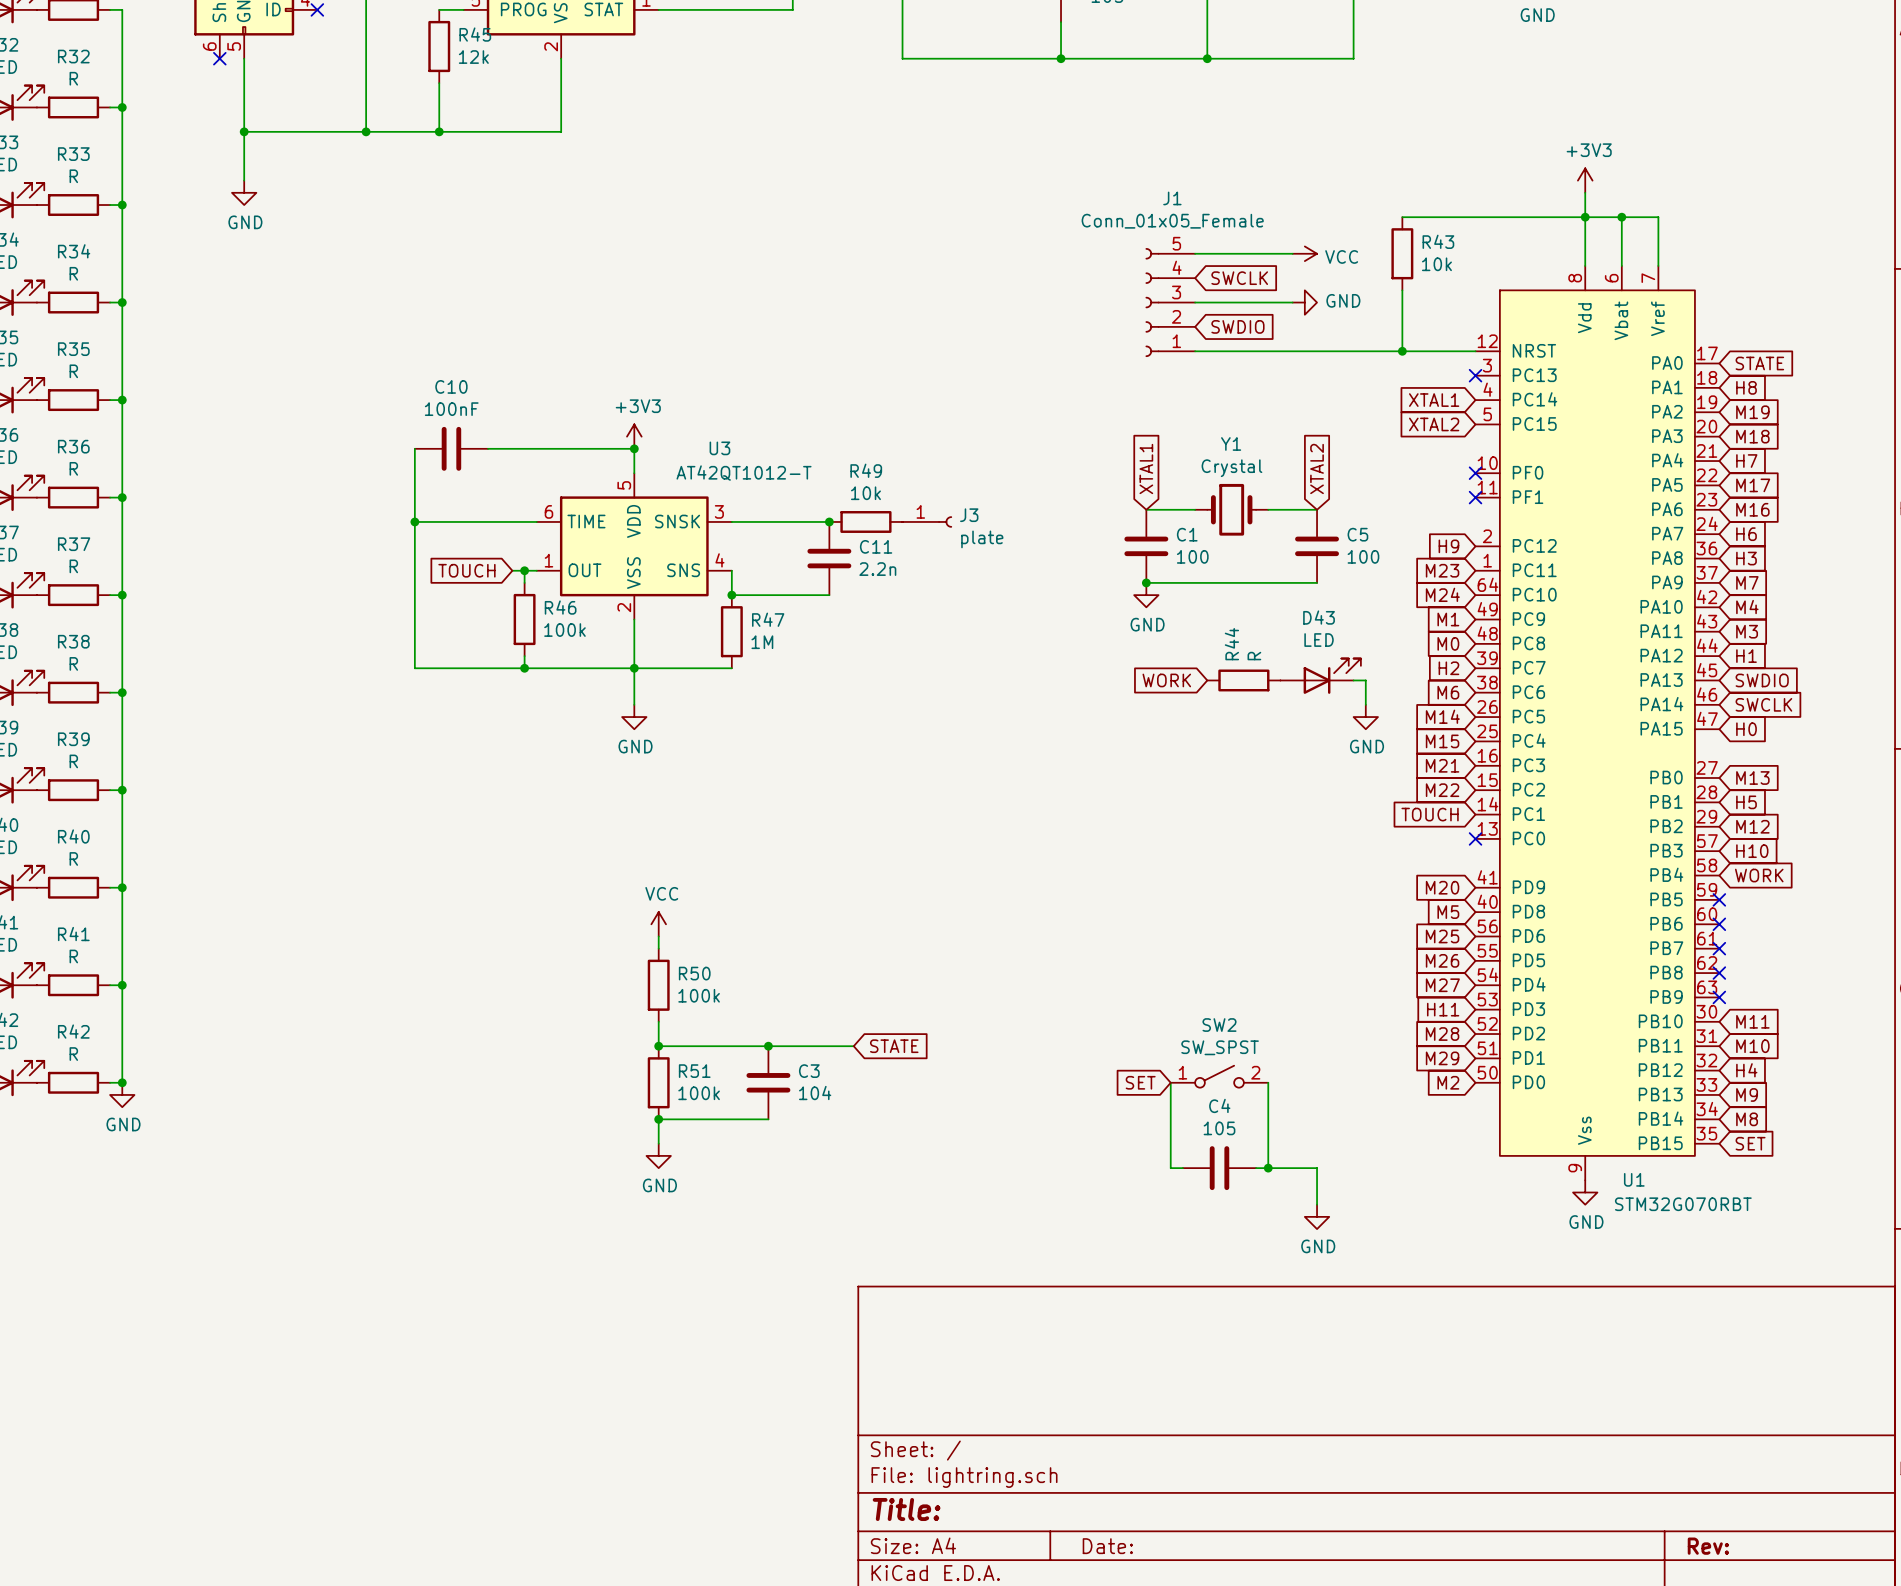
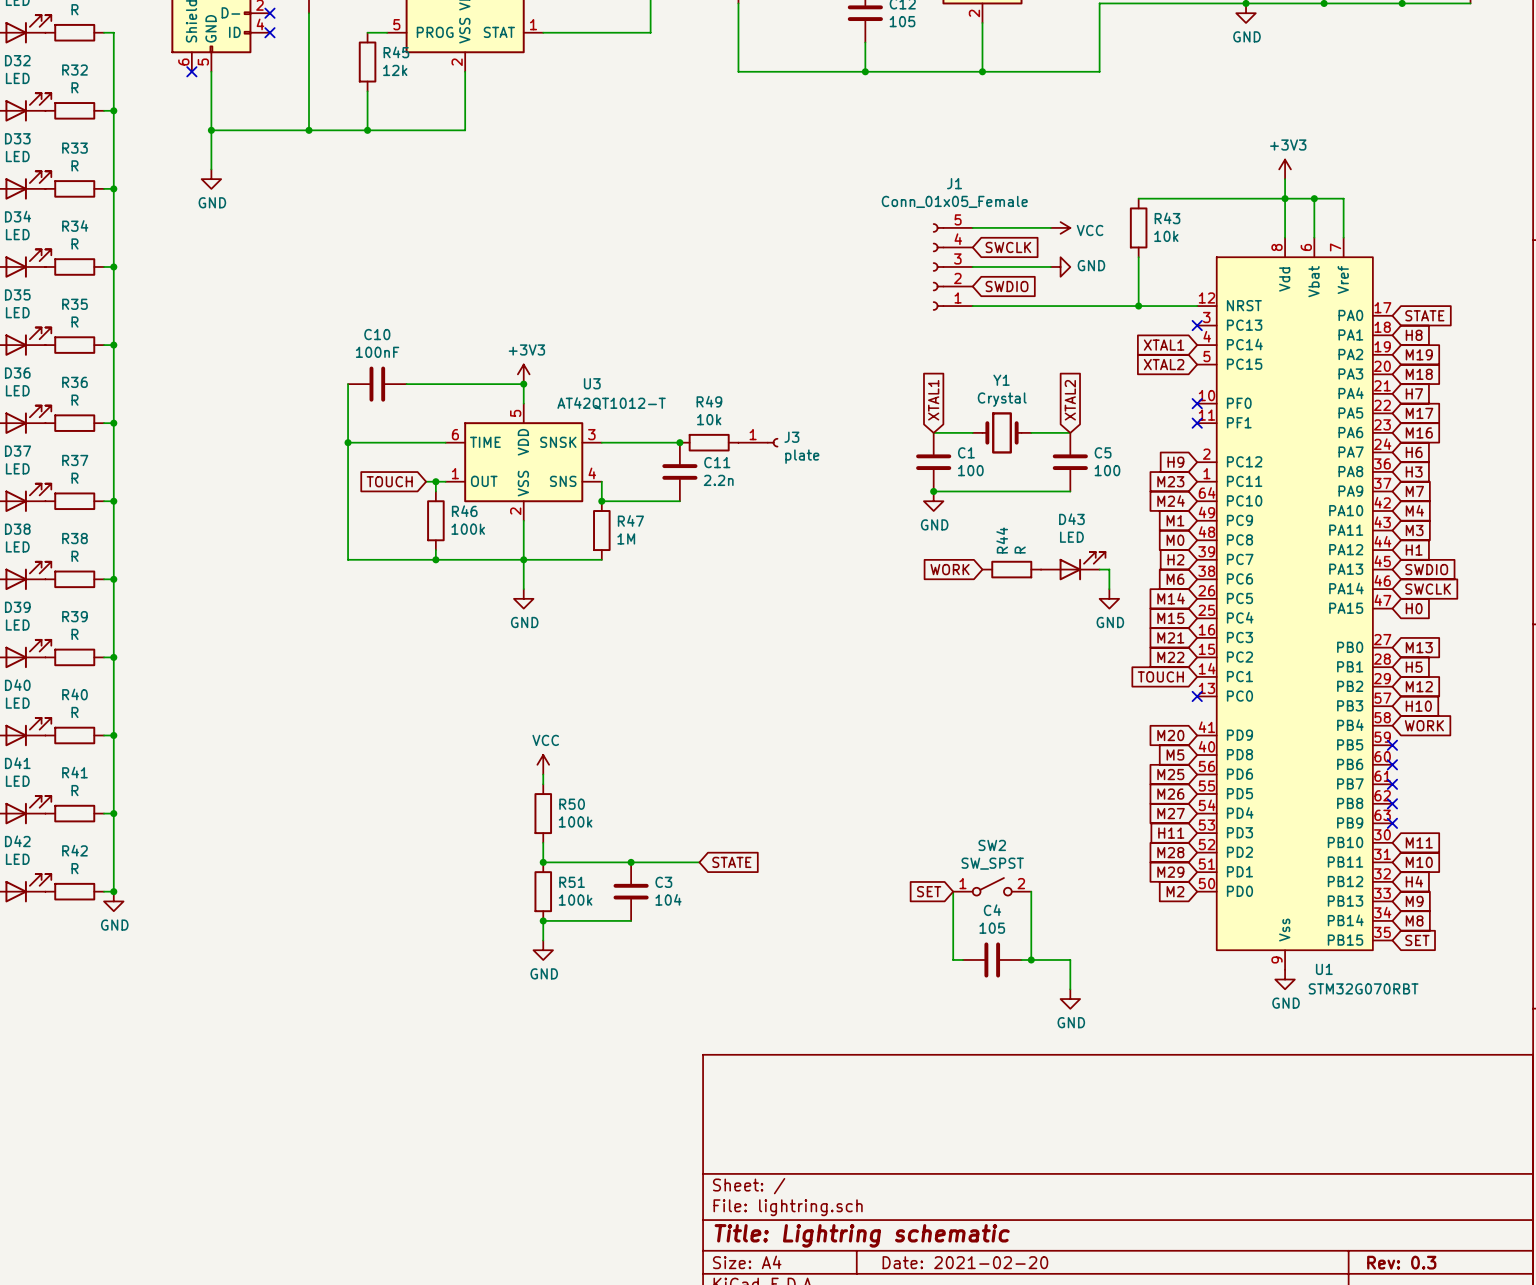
title block: Title: (906, 1509) -> Title: Lightring schematic (862, 1235)
title block: Date: (1107, 1546) -> Date: 2021-02-20 (965, 1262)
title block: Rev: (1708, 1546) -> Rev: 0.3 (1401, 1262)

